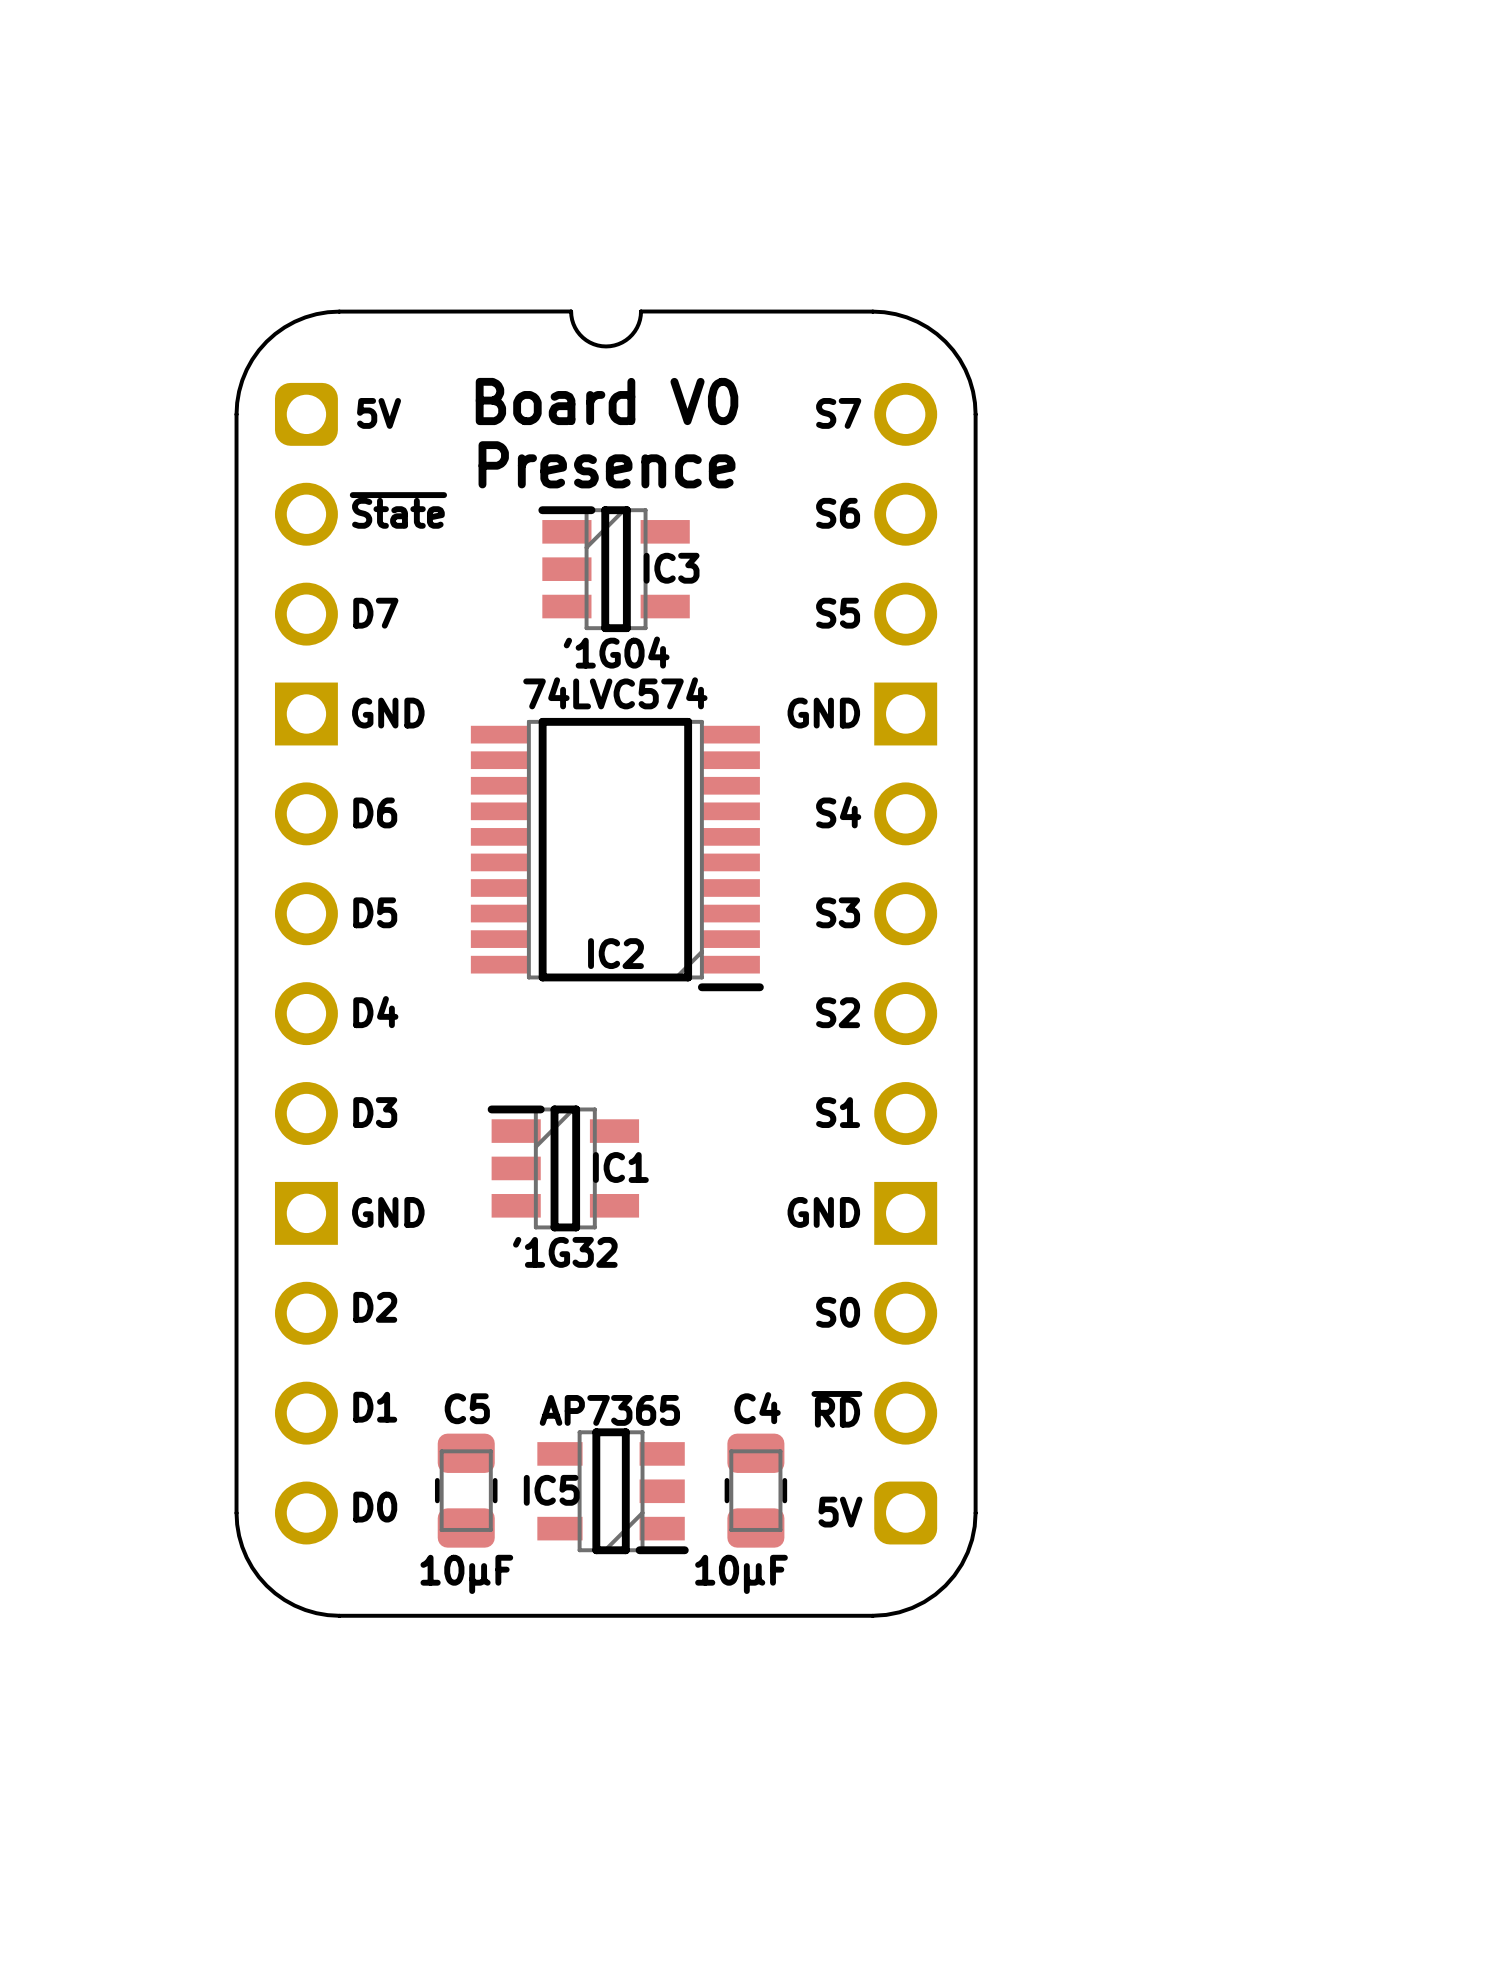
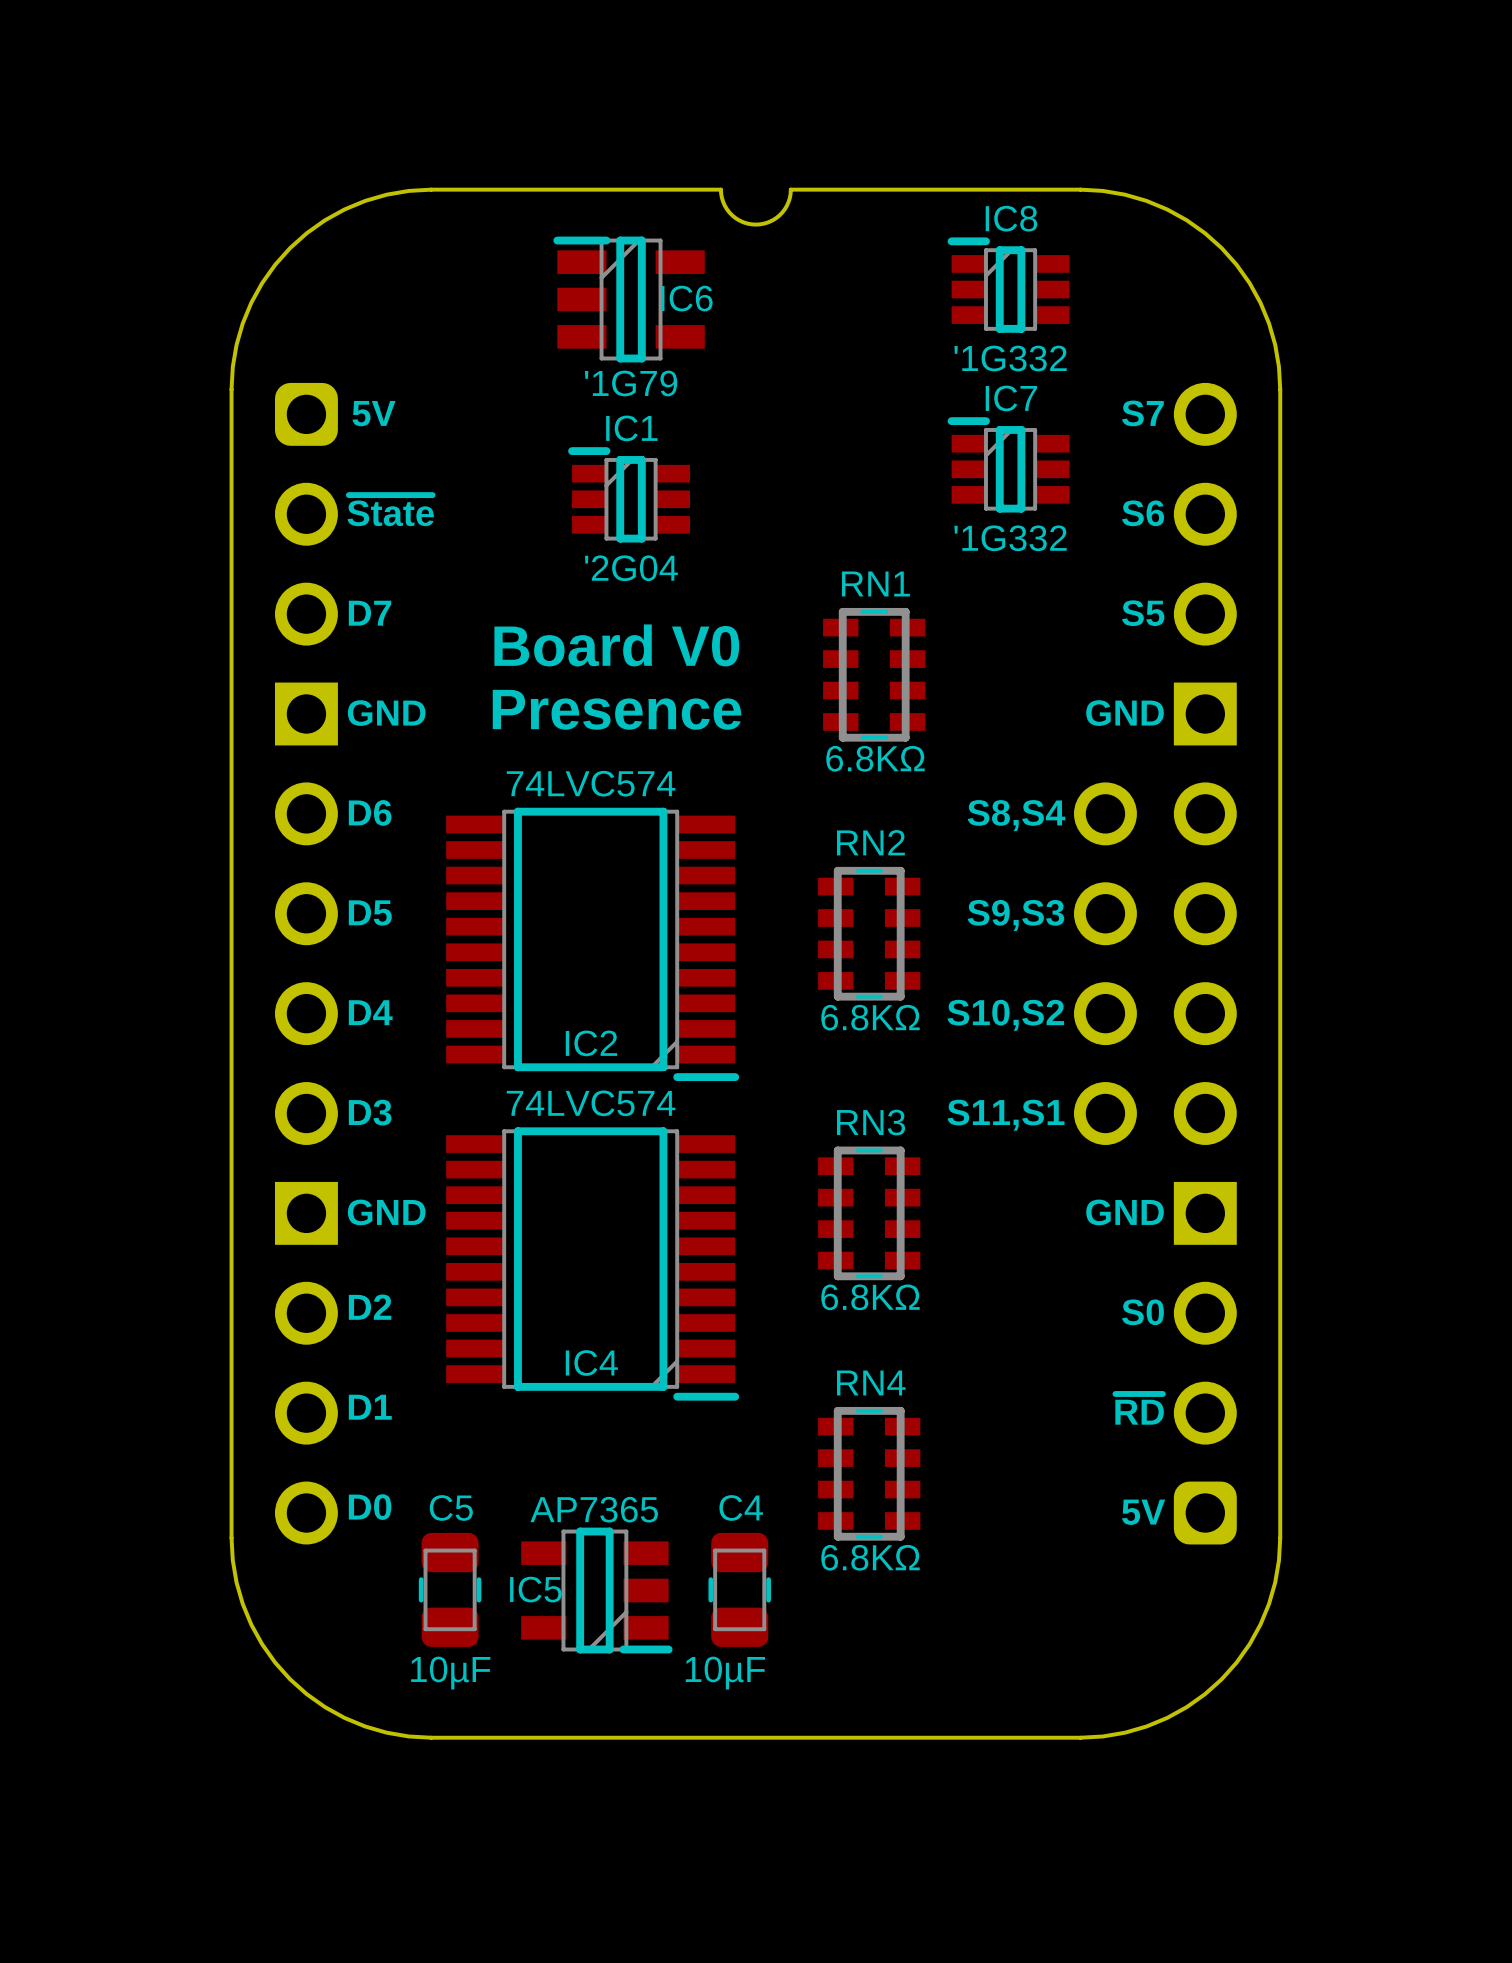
IC8: none -> (1008, 285)
IC6: none -> (629, 299)
text position: Board V0 (607, 401) -> Board V0 (616, 645)
text position: S7 (838, 413) -> S7 (1142, 413)
text position: Presence (607, 464) -> Presence (616, 709)
IC7: none -> (1008, 464)
text position: S6 (838, 513) -> S6 (1143, 513)
IC3: (614, 569) -> none
text position: S5 (838, 613) -> S5 (1143, 613)
RN1: none -> (874, 674)
text: GND (823, 713) -> none
text: none -> GND (1125, 713)
text: S4 (838, 812) -> none
text: none -> S8,S4 (1016, 815)
IC2 position: (617, 854) -> (592, 944)
text: S3 (838, 912) -> none
text: none -> S9,S3 (1015, 915)
RN2: none -> (869, 933)
part: (606, 963) -> none
part: none -> (755, 963)
part: none -> (1105, 963)
text: S2 (838, 1012) -> none
text: none -> S10,S2 (1005, 1015)
IC1 footprint: [487, 1105, 640, 1232] -> [568, 447, 691, 543]
text: S1 (838, 1112) -> none
text: none -> S11,S1 (1005, 1115)
IC1 name position: IC1 (620, 1167) -> IC1 (631, 428)
text: GND (823, 1212) -> none
text: none -> GND (1125, 1212)
RN3: none -> (869, 1213)
IC1 text: '1G32 (565, 1252) -> none
IC4: none -> (592, 1263)
text position: S0 (838, 1312) -> S0 (1142, 1312)
text position: ~{RD} (836, 1409) -> ~{RD} (1139, 1409)
RN4: none -> (869, 1473)
C5 position: (466, 1490) -> (450, 1589)
C4 position: (755, 1490) -> (739, 1589)
IC5 position: (613, 1491) -> (596, 1590)
text position: 5V (840, 1512) -> 5V (1143, 1512)

